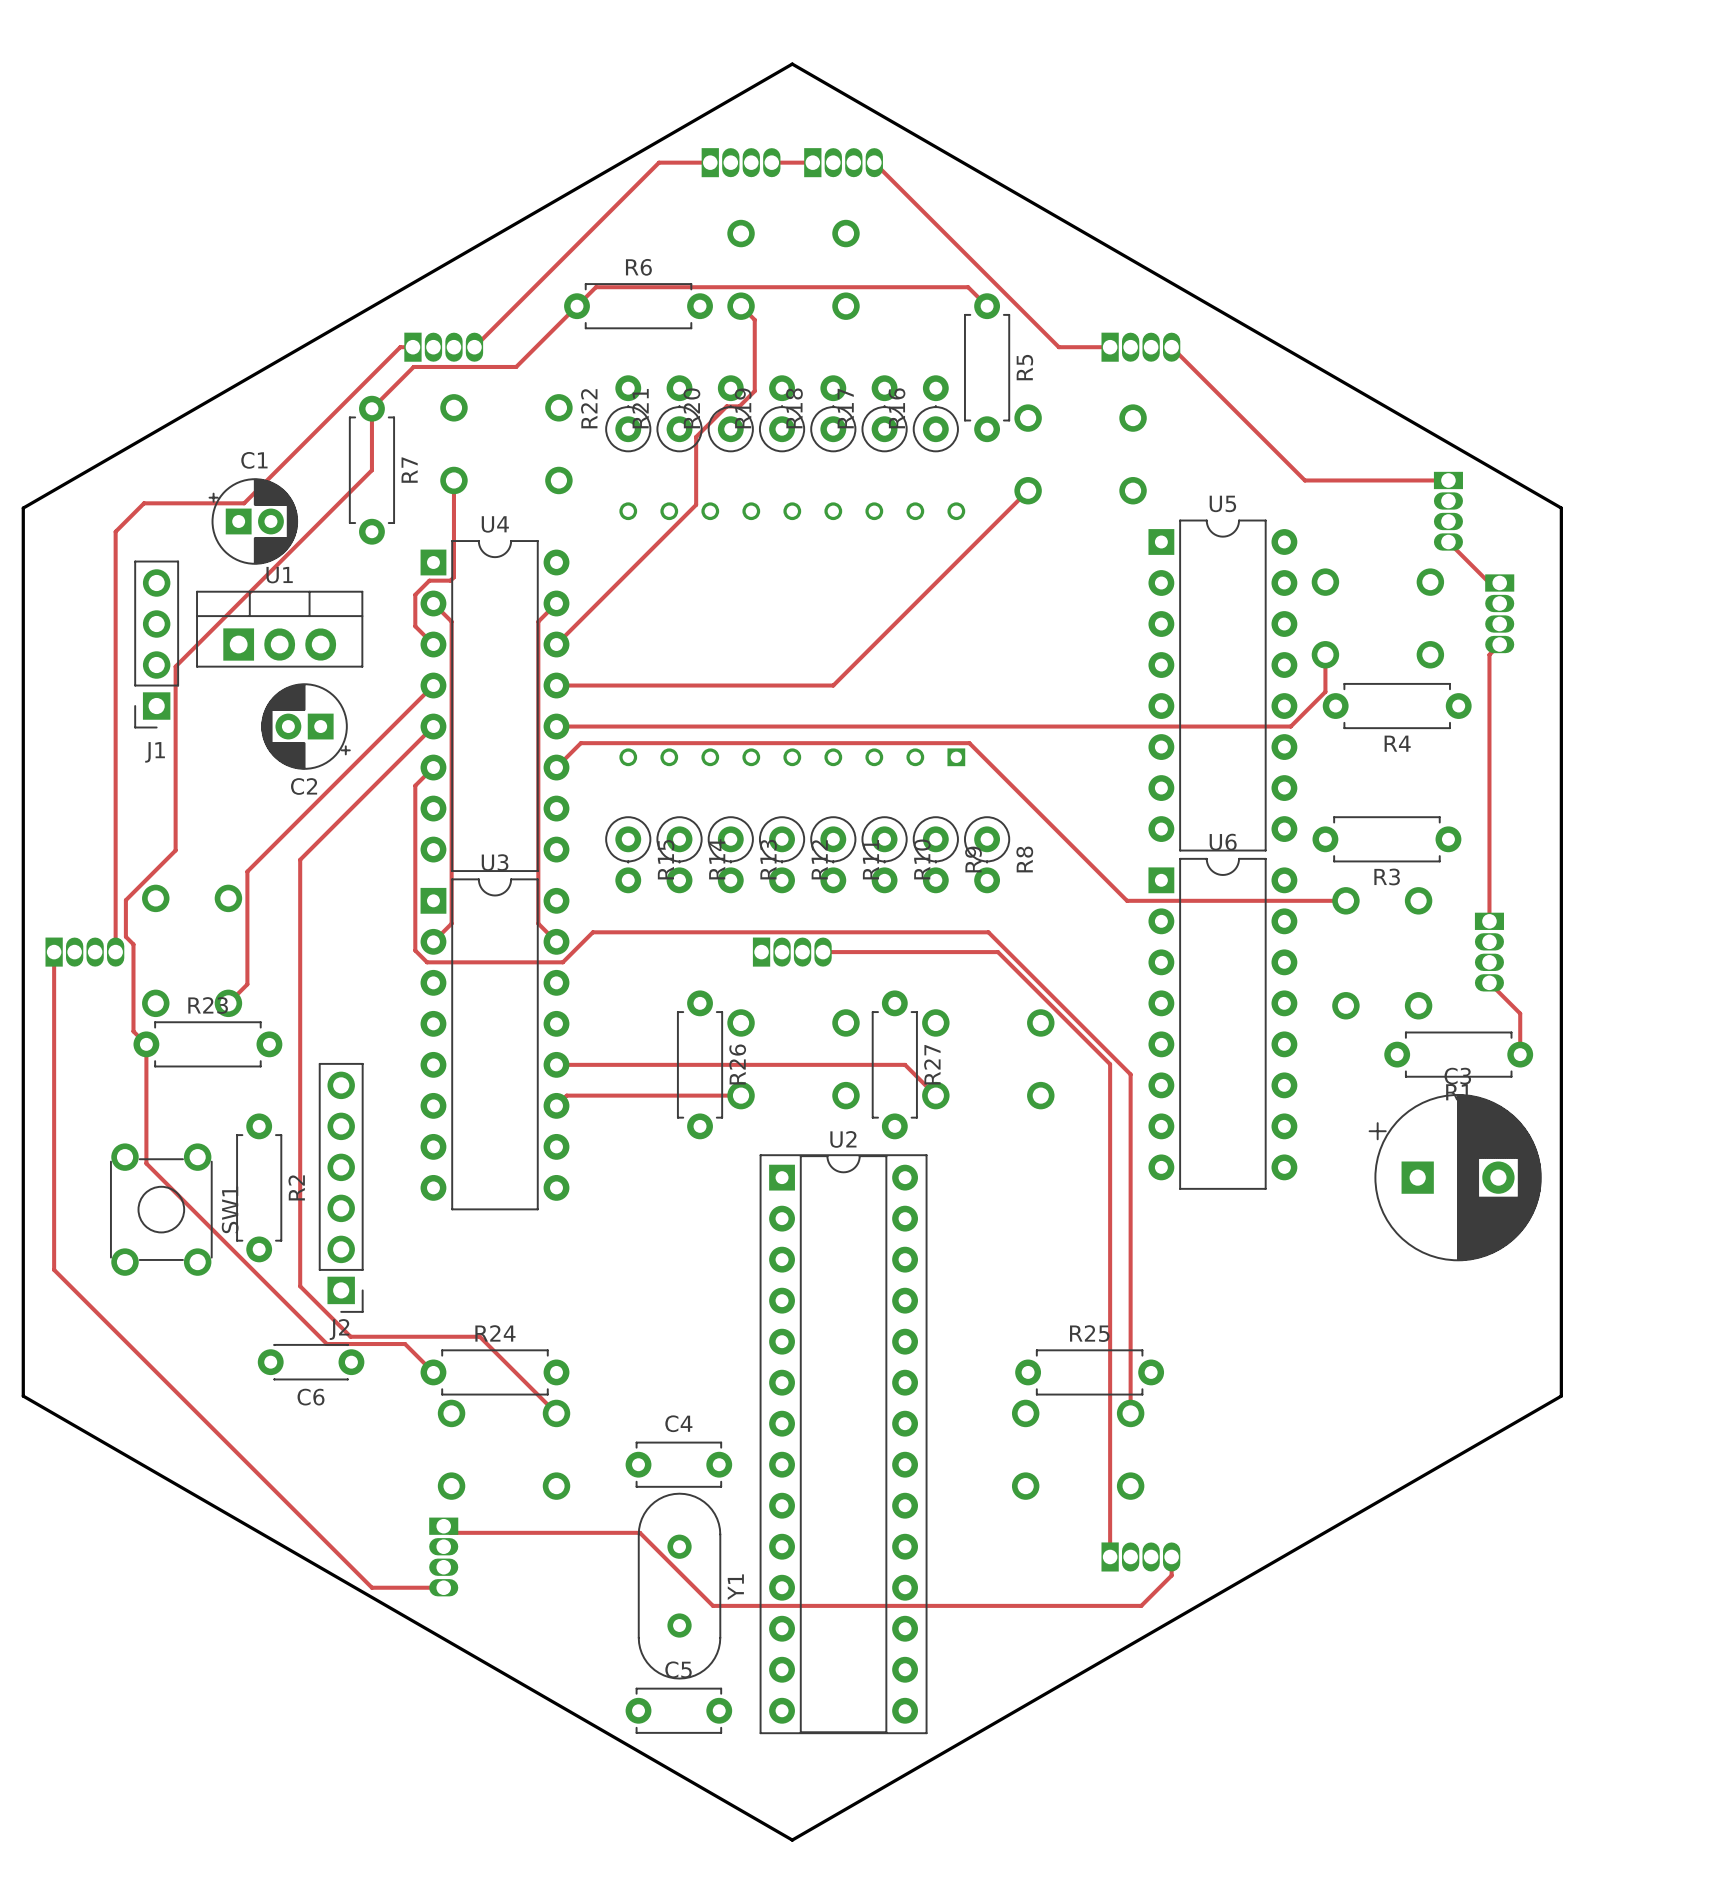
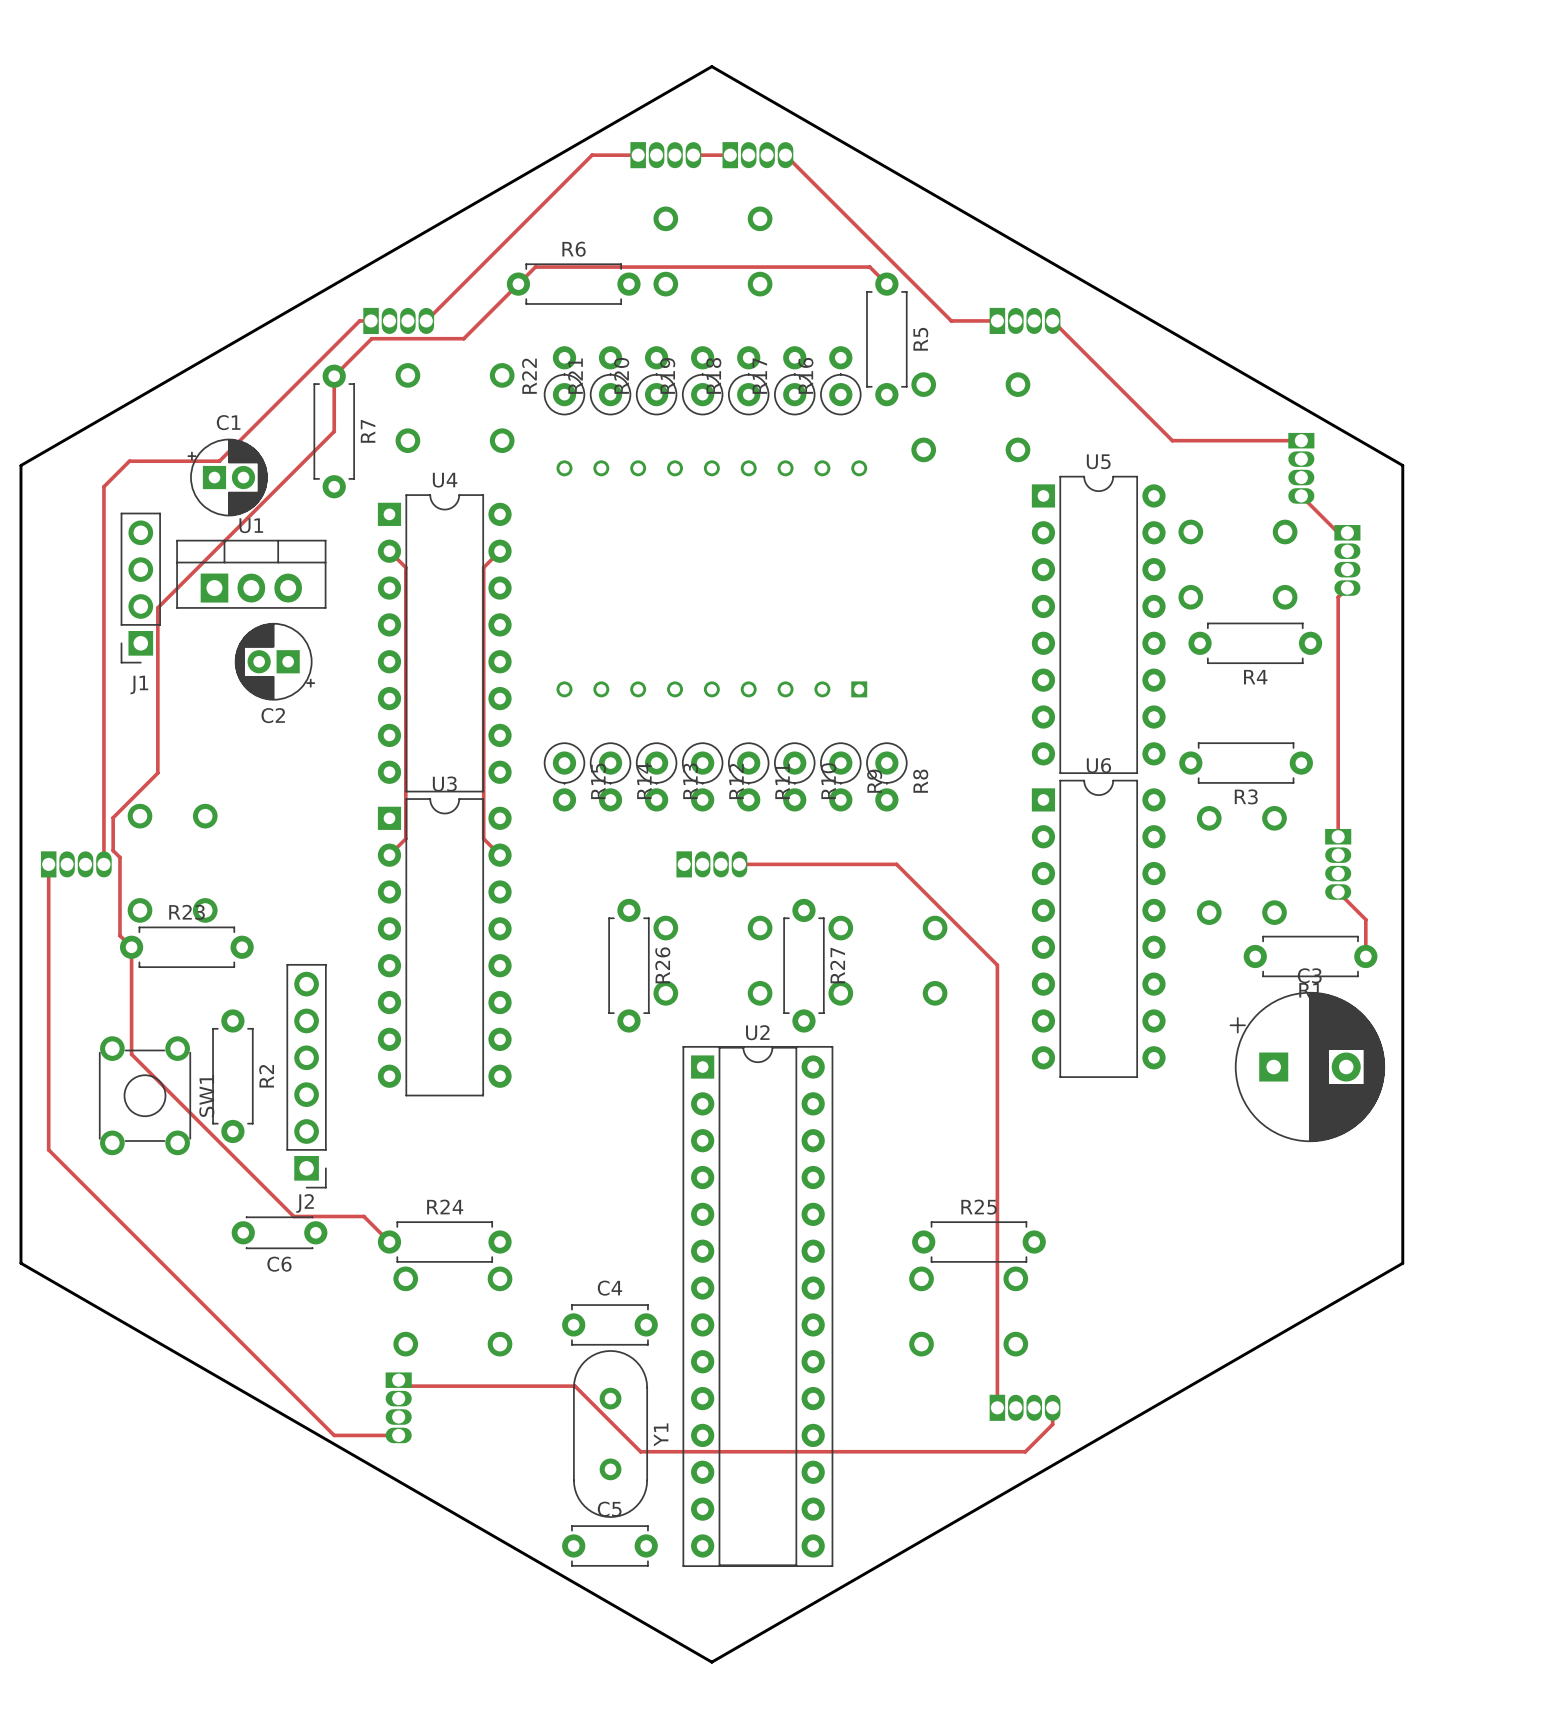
track: (741, 306) (754, 319) (754, 391) (739, 406) (726, 406) (696, 436) (696, 504) (556, 644) -> none
track: (453, 480) (453, 577) (450, 580) (429, 580) (415, 594) (415, 626) (433, 644) -> none
track: (1028, 490) (833, 685) (556, 685) -> none
track: (1325, 654) (1325, 691) (1290, 726) (556, 726) -> none
track: (433, 685) (247, 871) (247, 984) (228, 1003) -> none
track: (433, 726) (300, 859) (300, 1286) (350, 1336) (479, 1336) (556, 1413) -> none
track: (433, 767) (415, 785) (415, 950) (427, 962) (562, 962) (592, 932) (988, 932) (1130, 1074) (1130, 1413) -> none
track: (556, 767) (580, 743) (969, 743) (1127, 900) (1345, 900) -> none
track: (556, 1064) (905, 1064) (935, 1095) -> none
track: (741, 1095) (566, 1095) (556, 1105) -> none

